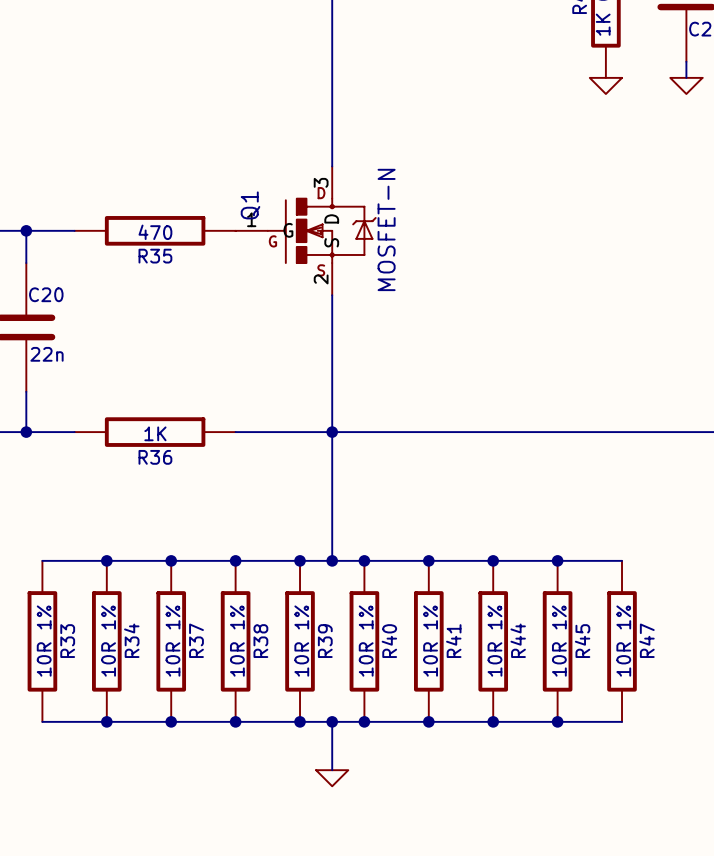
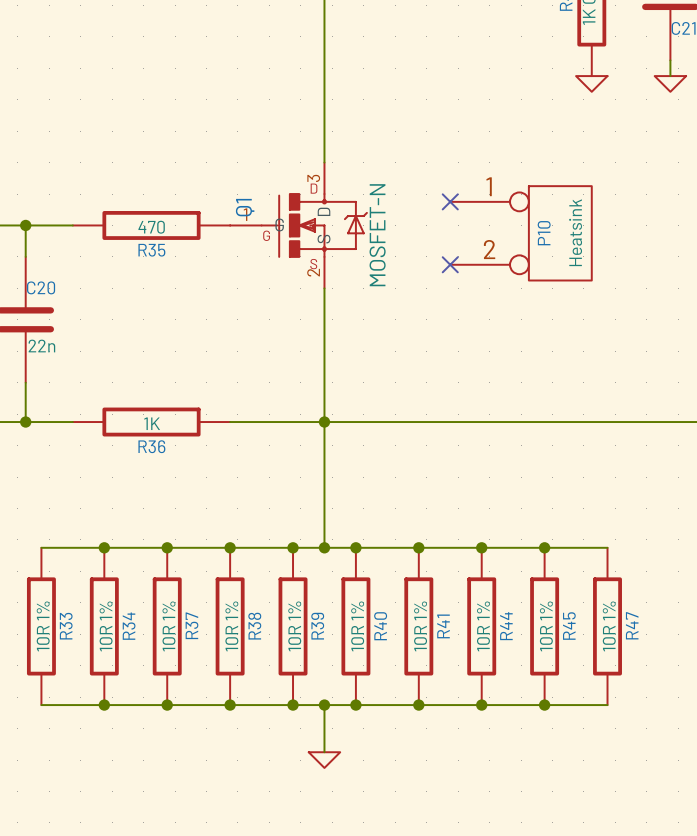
no-connect mark: none -> (450, 201)
P10: none -> Heatsink (521, 233)
no-connect mark: none -> (450, 264)

